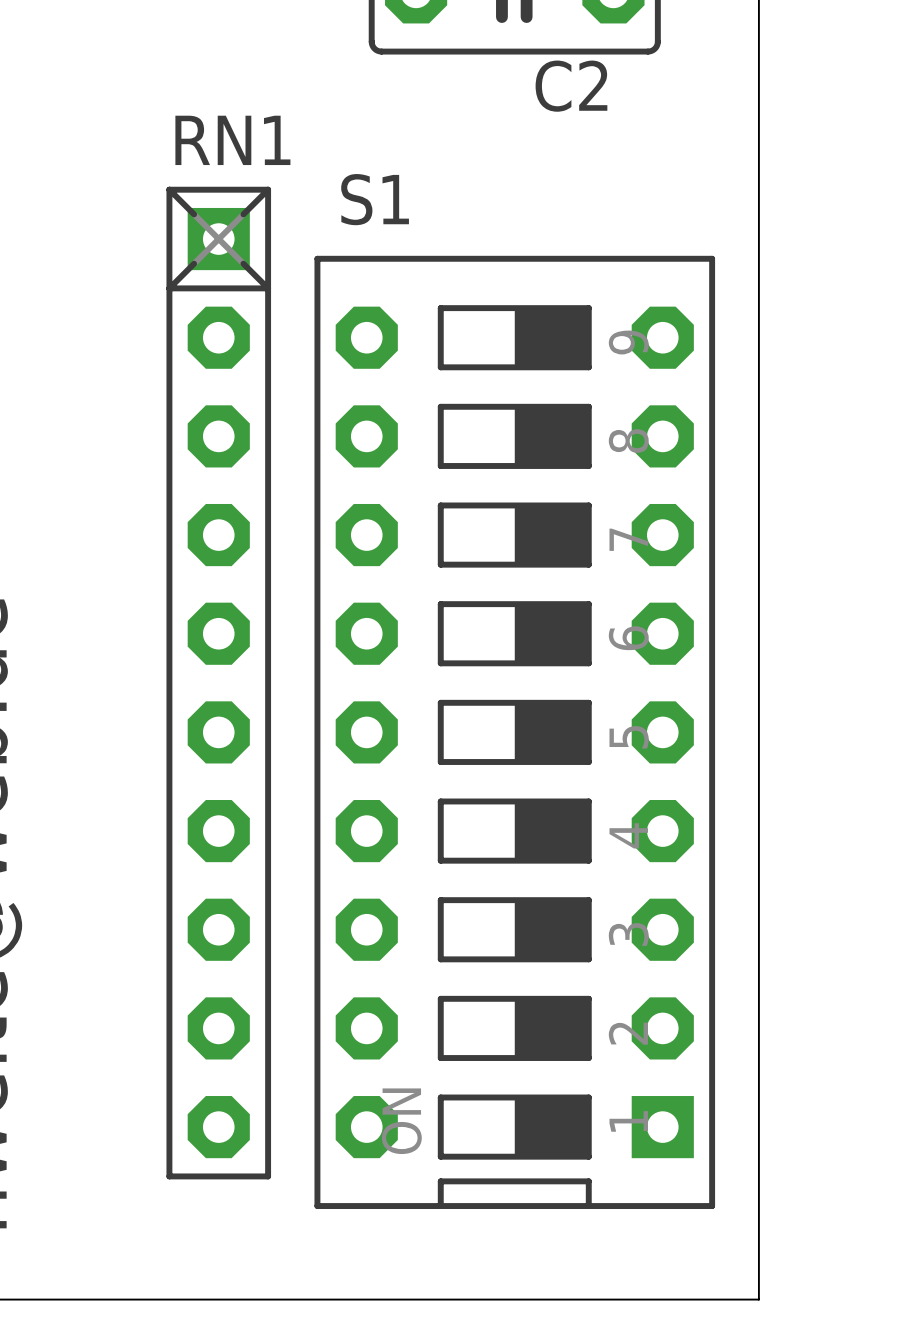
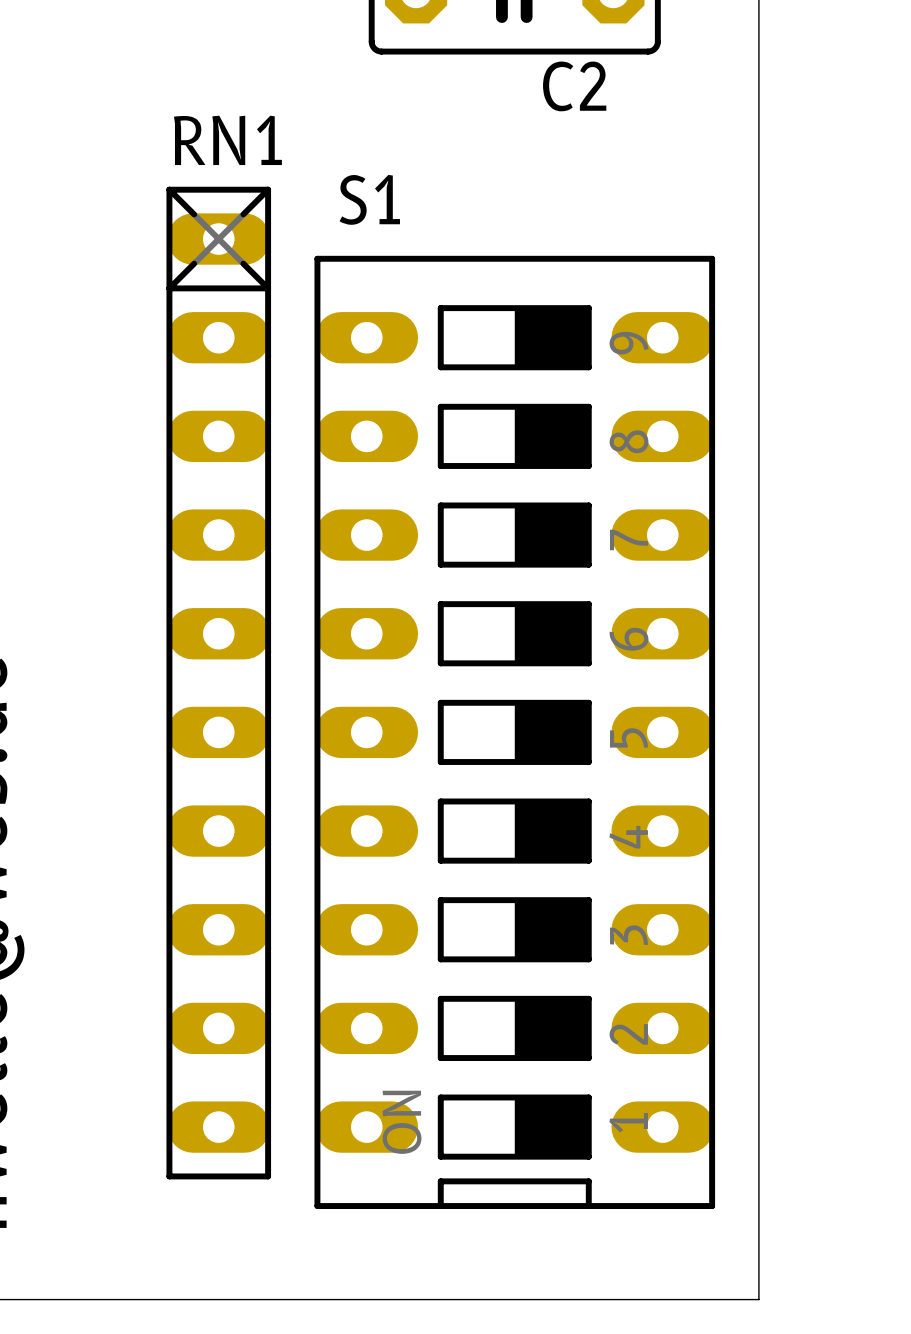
RN1 footprint: [166, 186, 272, 1180] -> [166, 186, 272, 1180]
S1 footprint: [314, 255, 716, 1209] -> [314, 255, 716, 1209]

